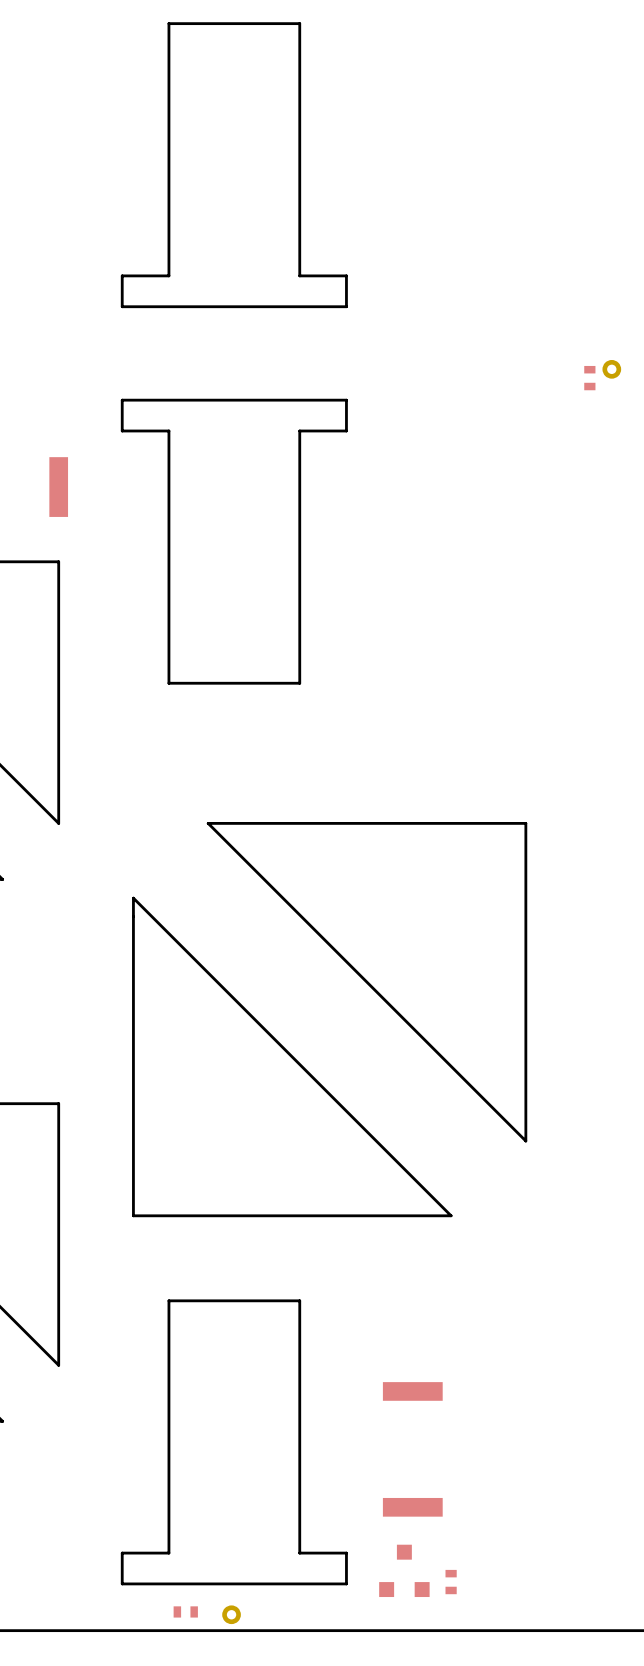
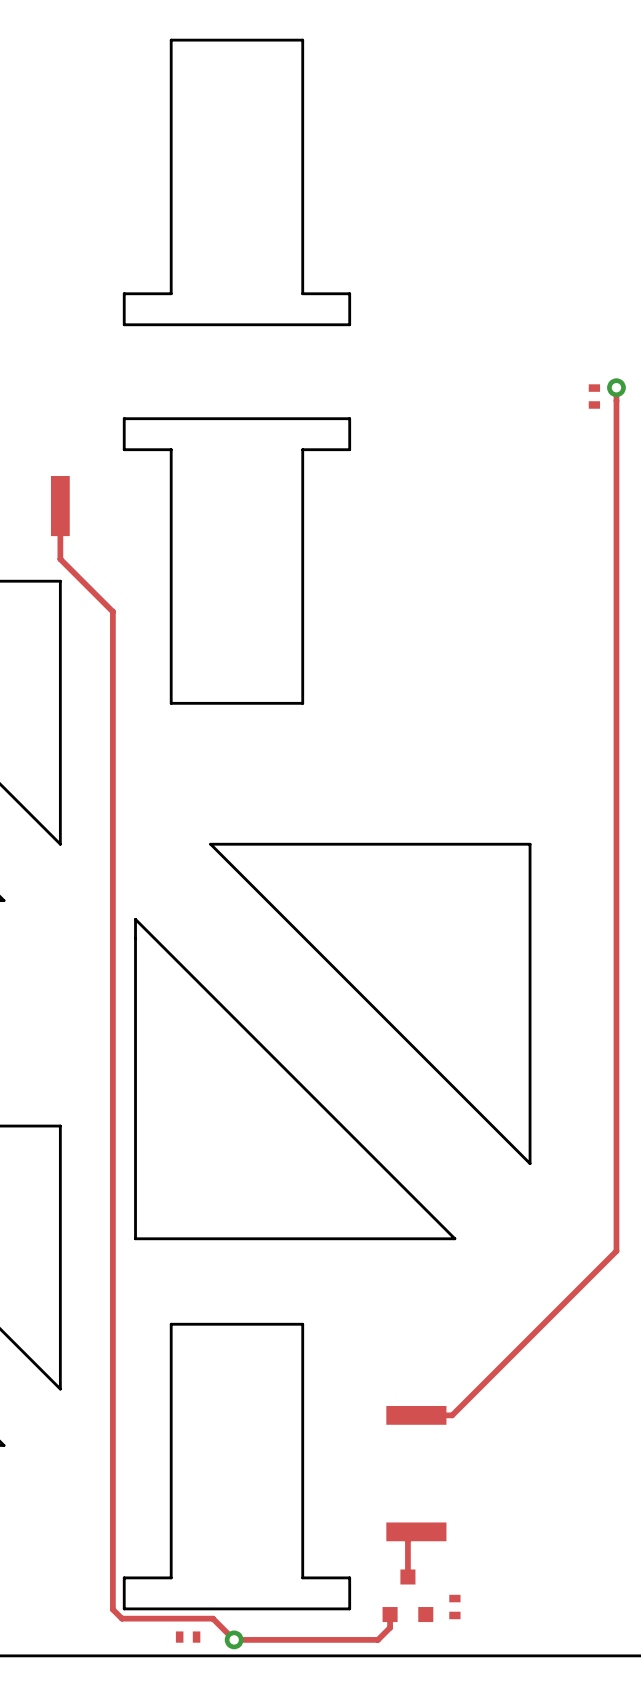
top track: none -> (616, 387) (616, 1251) (452, 1415) (416, 1415)
top track: none -> (60, 506) (60, 559) (112, 611) (112, 1609) (121, 1618) (212, 1618) (234, 1639) (377, 1639) (390, 1627) (390, 1614)
top track: none -> (416, 1531) (407, 1540) (407, 1576)

